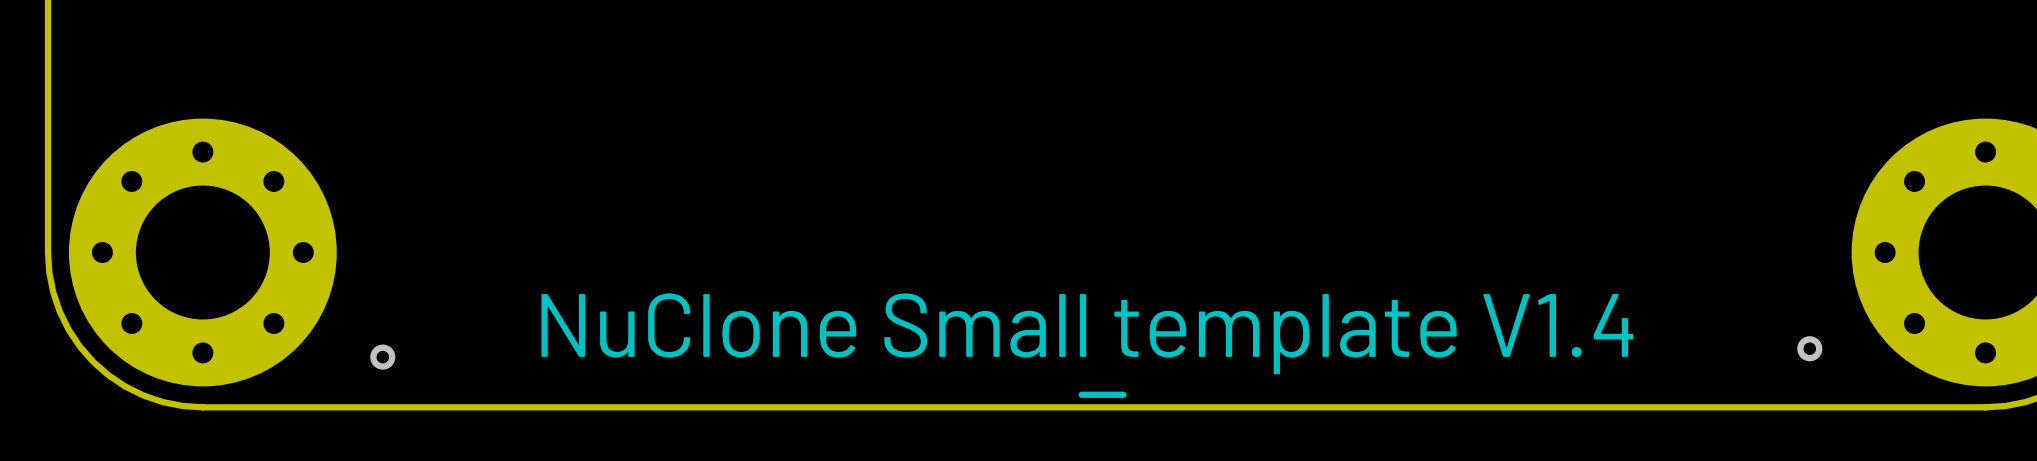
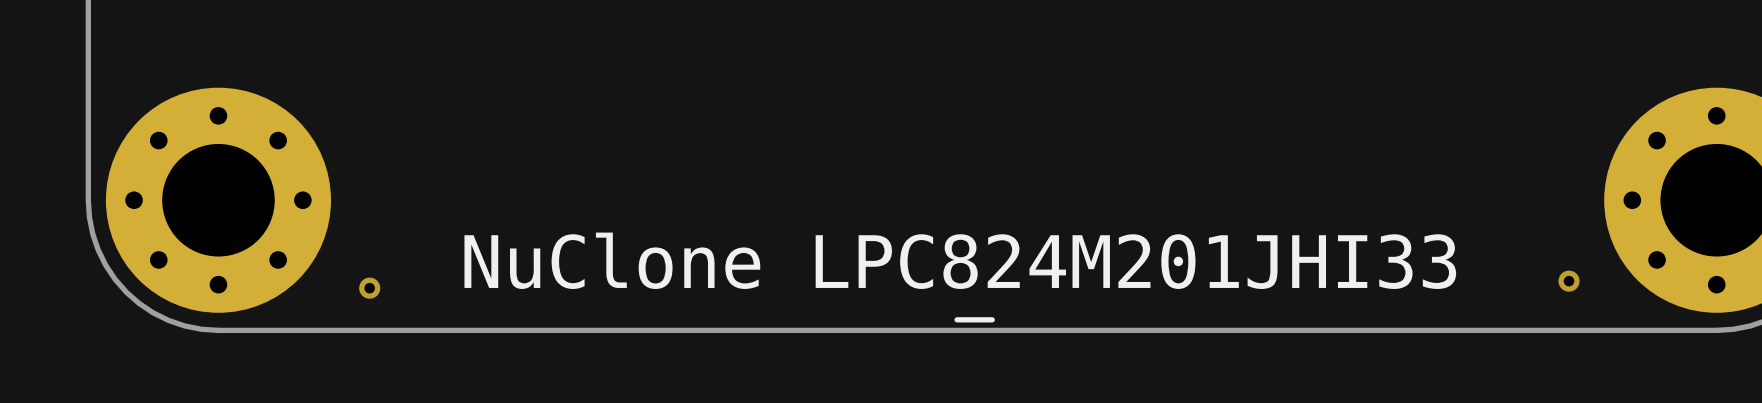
drawing shape: [541, 293, 1634, 398] -> [464, 232, 1457, 323]

